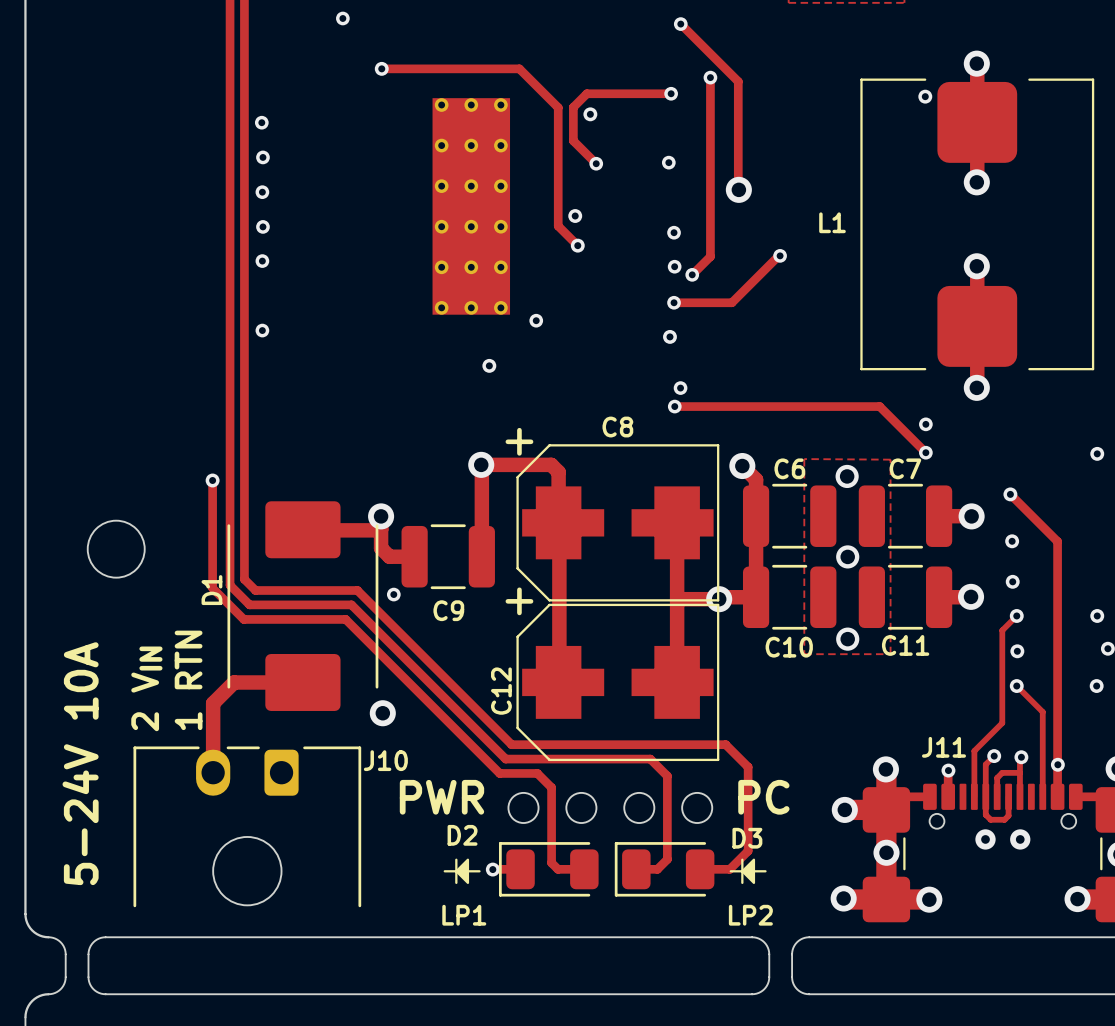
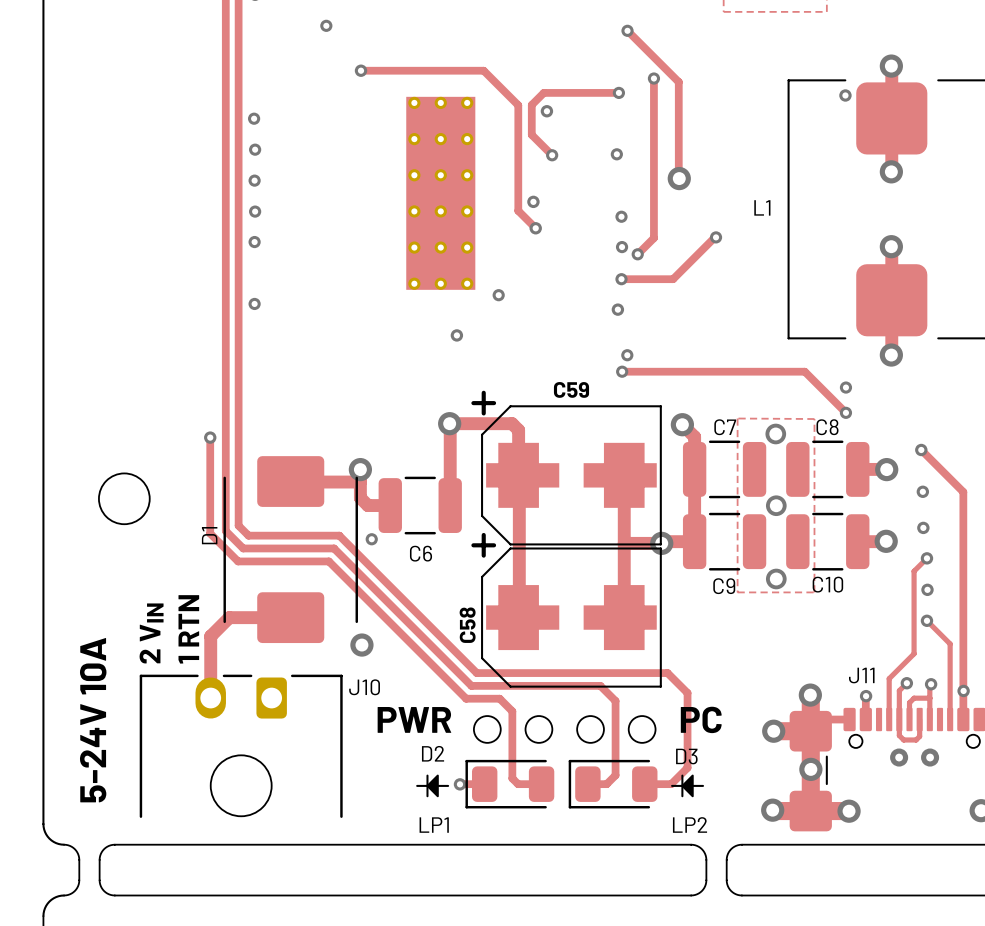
C8 name: C8 (617, 427) -> C59 (571, 389)
C6 name: C6 (789, 468) -> C7 (725, 427)
C7 name: C7 (905, 468) -> C8 (827, 427)
C9 name: C9 (448, 610) -> C6 (421, 553)
C11 name: C11 (905, 645) -> C10 (827, 584)
C10 name: C10 (789, 647) -> C9 (724, 586)
C12 name: C12 (501, 691) -> C58 (467, 625)

